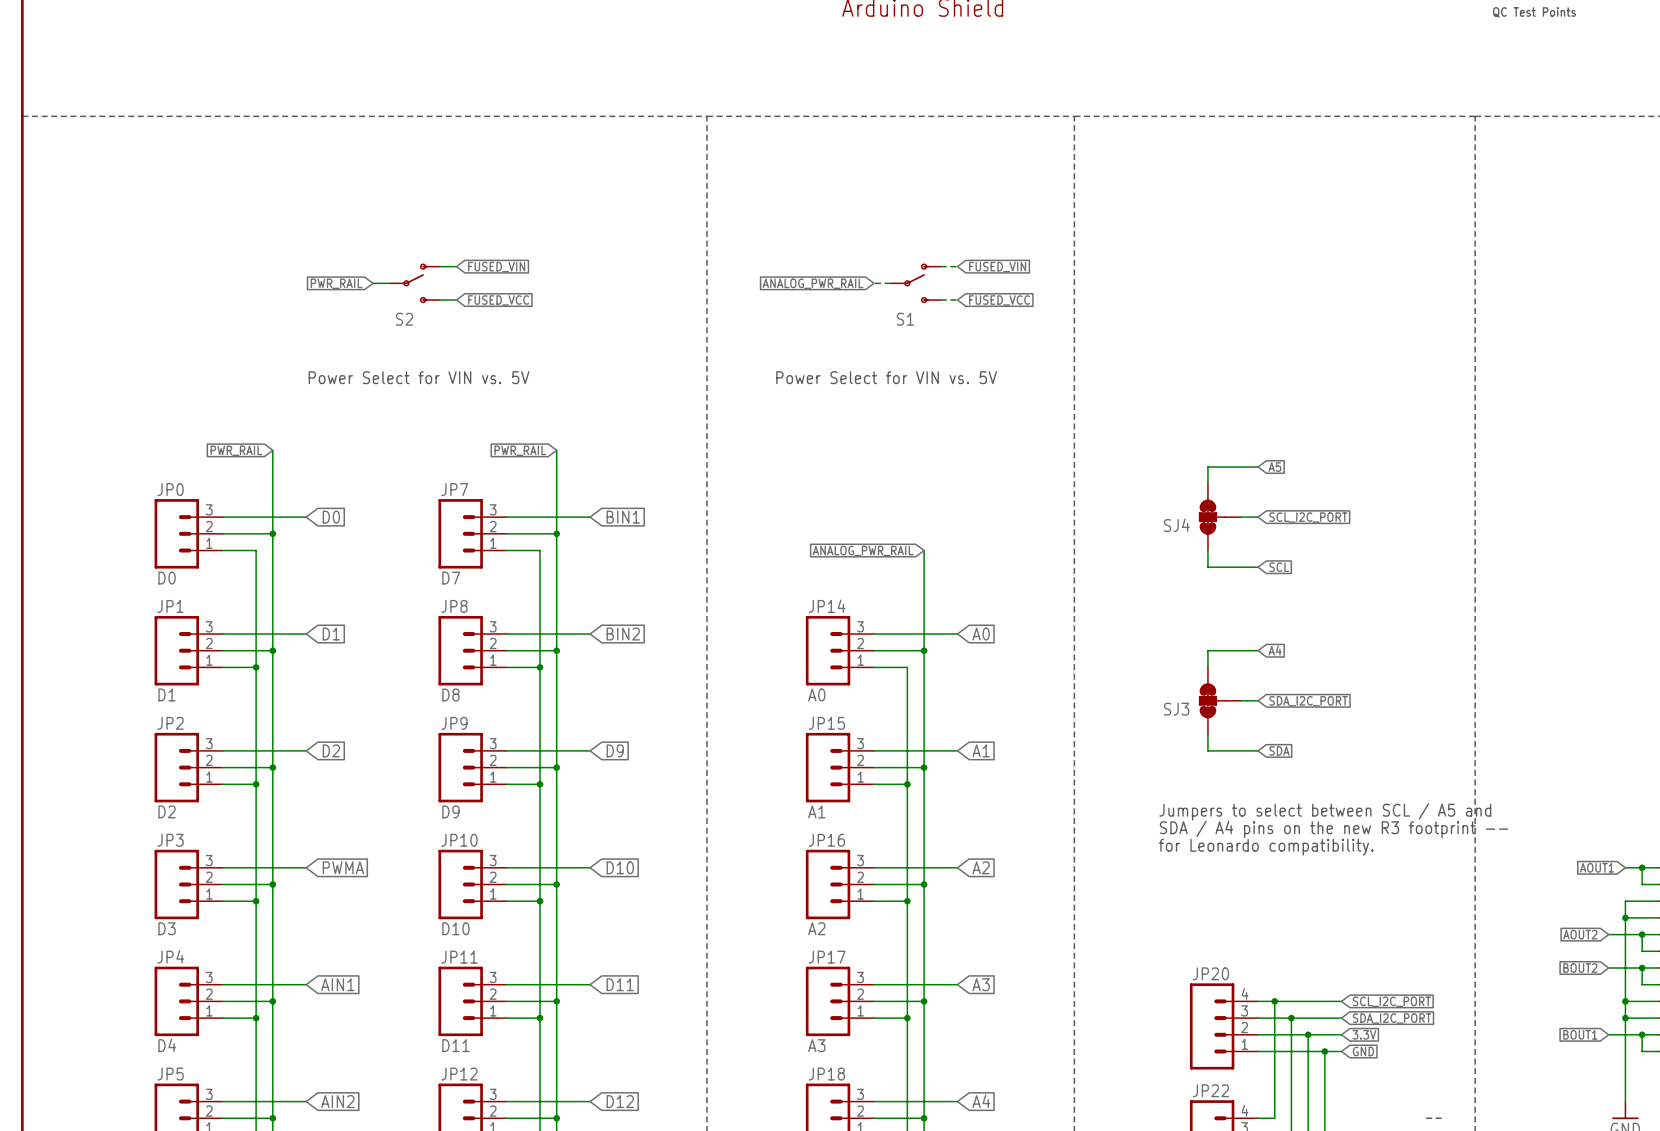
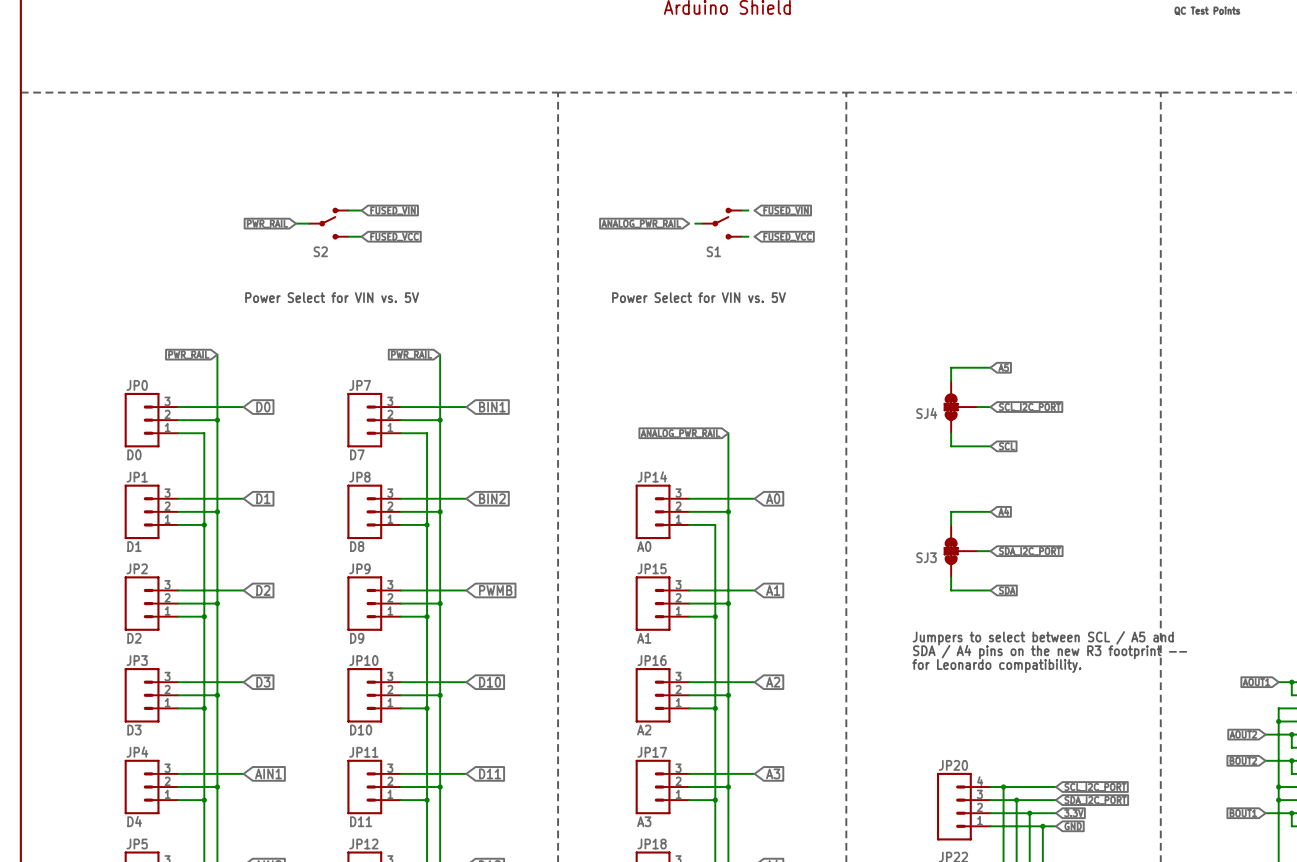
global label: D9 (615, 750) -> PWMB (495, 590)
global label: PWMA (343, 867) -> D3 (263, 682)

